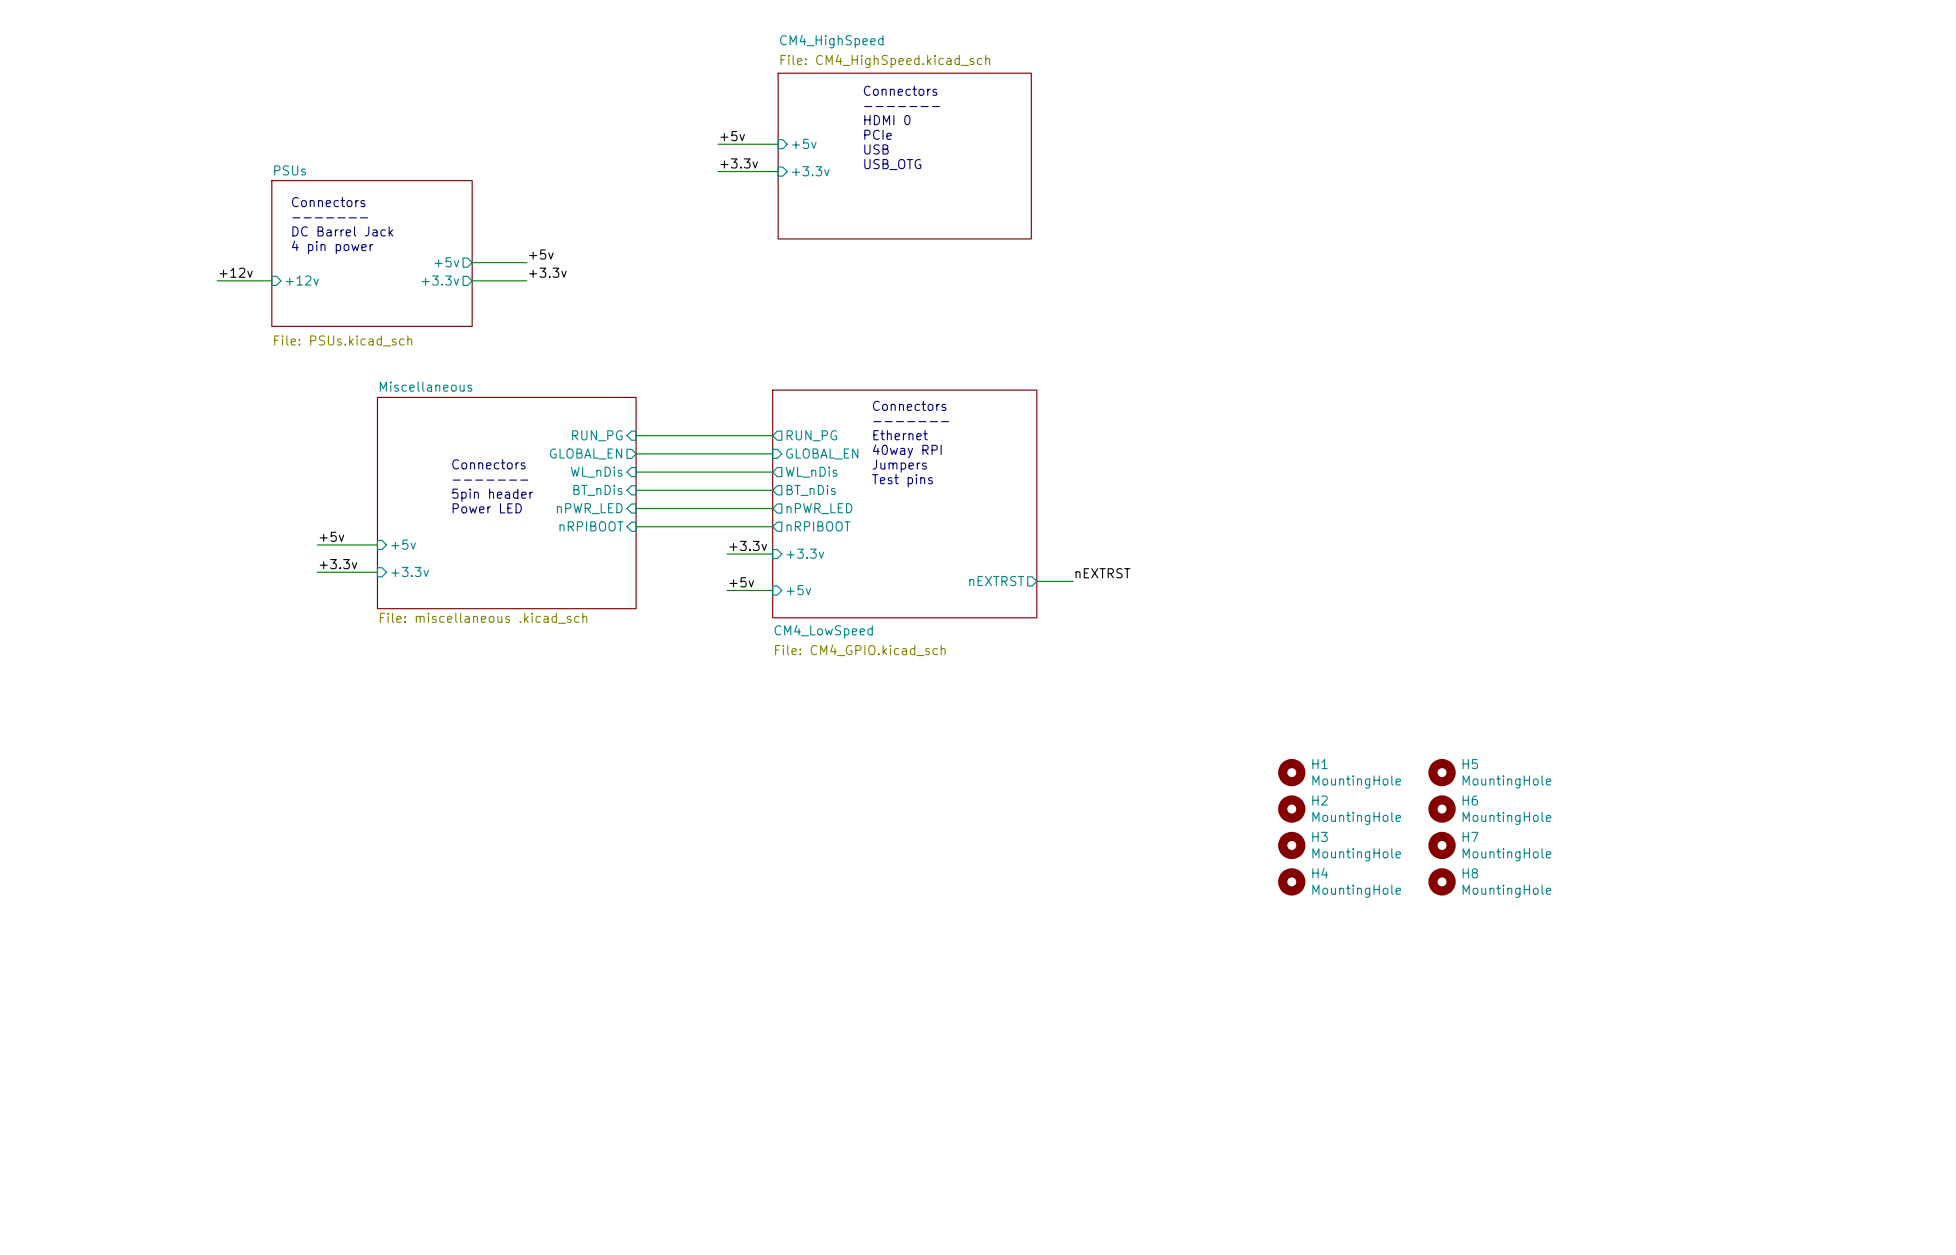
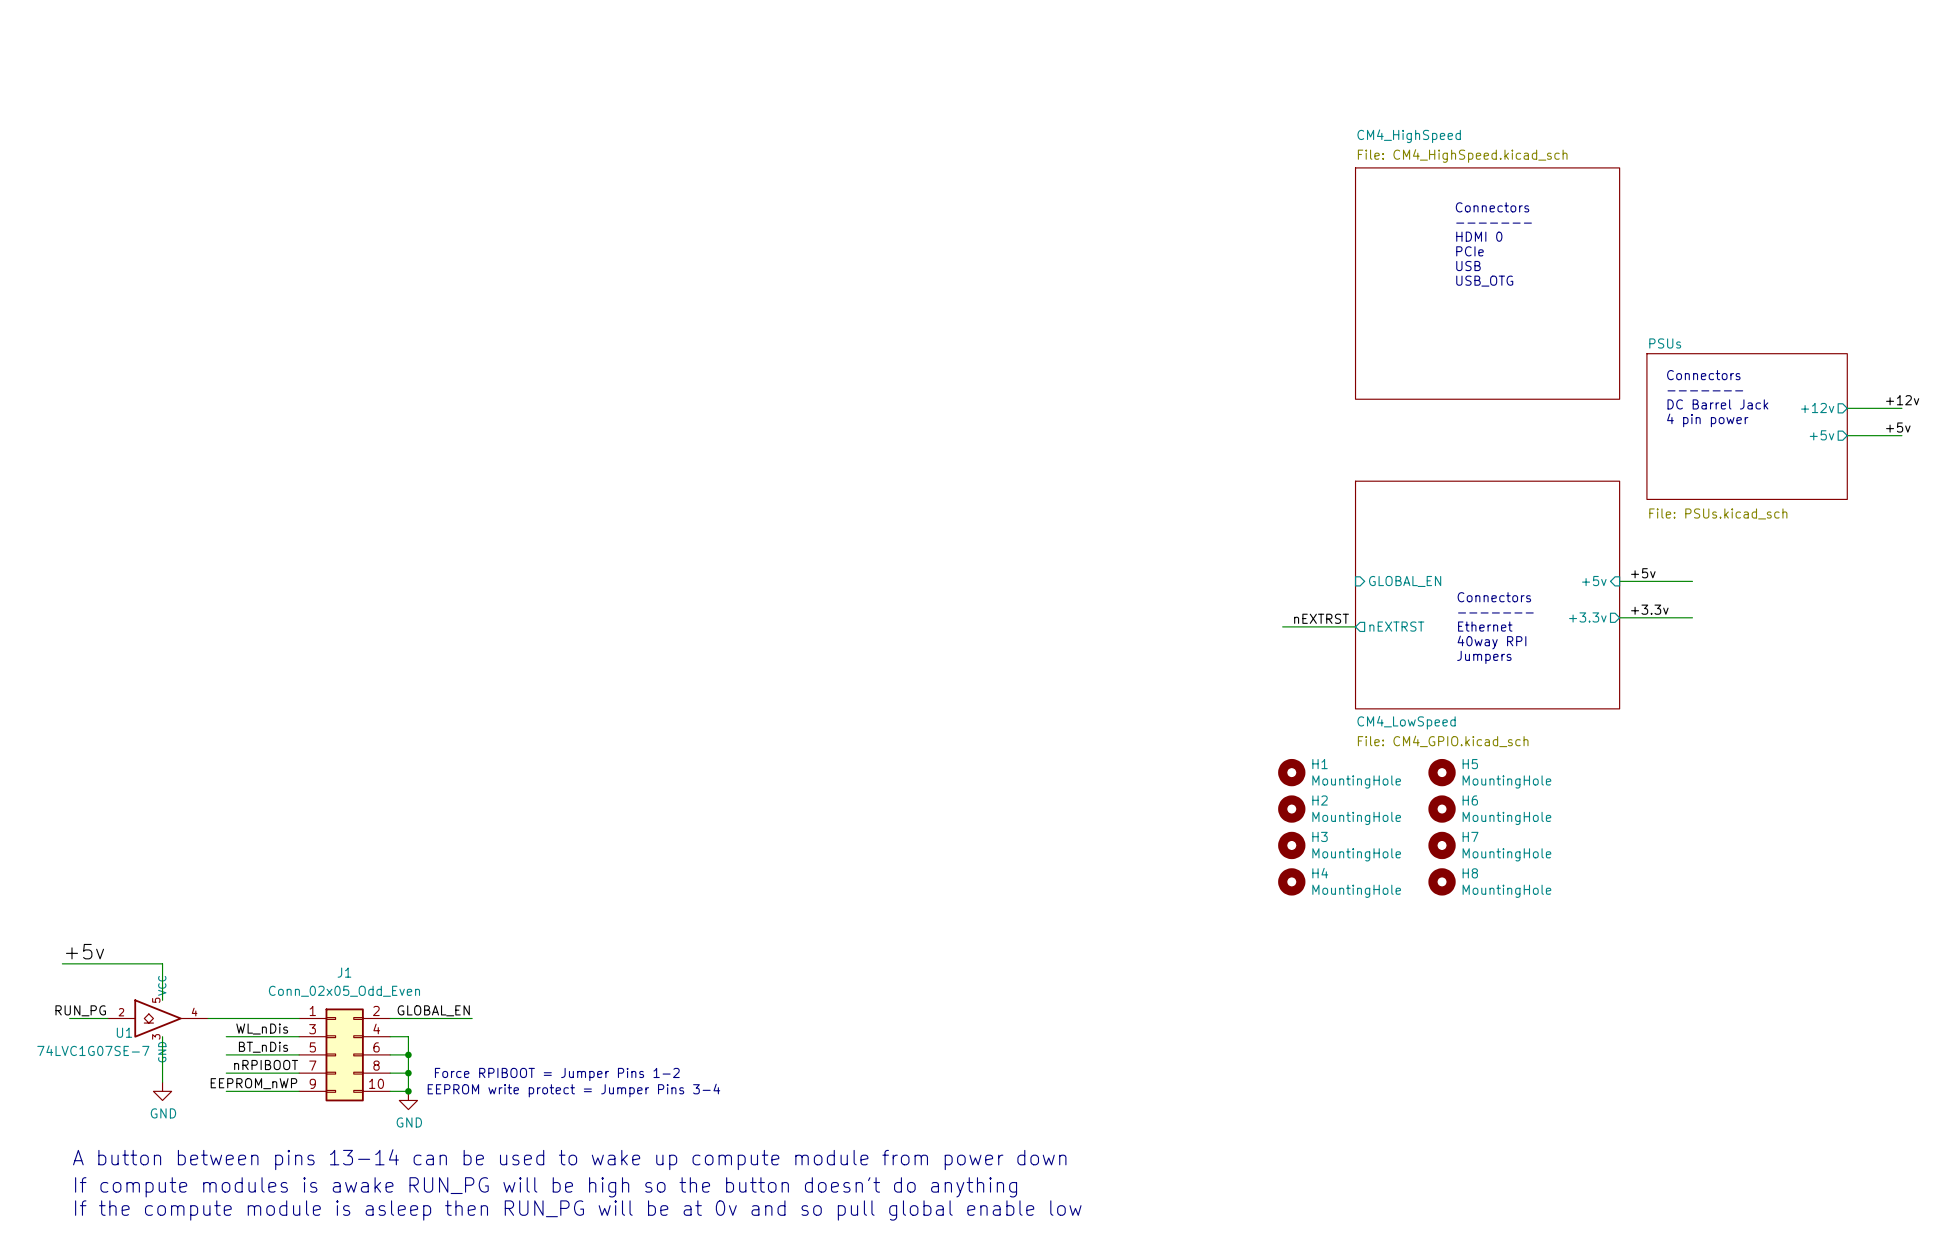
sheet CM4_HighSpeed name position: CM4_HighSpeed (831, 41) -> CM4_HighSpeed (1409, 136)
sheet CM4_HighSpeed value position: File: CM4_HighSpeed.kicad_sch (885, 61) -> File: CM4_HighSpeed.kicad_sch (1462, 156)
sheet CM4_HighSpeed shape: [777, 72, 1032, 240] -> [1354, 167, 1621, 400]
text: Connectors (900, 90) -> none
text: ------- (902, 106) -> none
text: HDMI 0 (887, 120) -> none
text: PCIe (878, 134) -> none
label: +5v (732, 136) -> none
sheet pin: +5v (804, 143) -> none
wire: (718, 144) (778, 144) -> none
text: USB (876, 149) -> none
label: +3.3v (739, 163) -> none
text: USB_OTG (892, 164) -> none
wire: (718, 171) (778, 171) -> none
sheet pin: +3.3v (810, 171) -> none
text: Connectors (328, 202) -> none
text: none -> Connectors (1492, 207)
text: ------- (330, 217) -> none
text: none -> ------- (1494, 223)
text: DC Barrel Jack (342, 231) -> none
text: none -> HDMI 0 (1479, 236)
text: 4 pin power (332, 247) -> none
text: none -> PCIe (1469, 251)
sheet PSUs: File: PSUs.kicad_sch (371, 253) -> none
label: +5v (541, 254) -> none
sheet pin: +5v (446, 262) -> none
wire: (472, 262) (526, 262) -> none
text: none -> USB (1468, 266)
label: +12v (236, 272) -> none
label: +3.3v (547, 272) -> none
wire: (217, 280) (271, 280) -> none
sheet pin: +12v (302, 280) -> none
sheet pin: +3.3v (440, 280) -> none
wire: (472, 280) (526, 280) -> none
text: none -> USB_OTG (1484, 281)
text: none -> Connectors (1703, 375)
text: none -> ------- (1705, 390)
label: none -> +12v (1902, 400)
text: none -> DC Barrel Jack (1717, 404)
text: Connectors (909, 405) -> none
sheet pin: none -> +12v (1817, 408)
wire: none -> (1847, 408) (1901, 408)
text: none -> 4 pin power (1707, 420)
text: ------- (911, 421) -> none
sheet PSUs: none -> File: PSUs.kicad_sch (1747, 426)
label: none -> +5v (1898, 427)
sheet pin: RUN_PG (597, 435) -> none
wire: (636, 435) (772, 435) -> none
sheet pin: RUN_PG (811, 435) -> none
text: Ethernet (900, 435) -> none
sheet pin: none -> +5v (1821, 435)
wire: none -> (1847, 435) (1901, 435)
text: 40way RPI (907, 451) -> none
sheet pin: GLOBAL_EN (586, 453) -> none
wire: (636, 453) (772, 453) -> none
sheet pin: GLOBAL_EN (822, 453) -> none
text: Connectors (488, 464) -> none
text: Jumpers (899, 466) -> none
sheet pin: WL_nDis (596, 472) -> none
wire: (636, 472) (772, 472) -> none
sheet pin: WL_nDis (811, 472) -> none
text: ------- (490, 480) -> none
text: Test pins (902, 480) -> none
sheet pin: BT_nDis (598, 490) -> none
wire: (636, 490) (772, 490) -> none
sheet pin: BT_nDis (811, 490) -> none
text: 5pin header (492, 495) -> none
sheet Miscellaneous: File: miscellaneous .kicad_sch (506, 503) -> none
sheet CM4_LowSpeed position: (904, 503) -> (1487, 595)
text: Power LED (487, 508) -> none
sheet pin: nPWR_LED (589, 508) -> none
wire: (636, 508) (772, 508) -> none
sheet pin: nPWR_LED (819, 508) -> none
sheet pin: nRPIBOOT (591, 526) -> none
wire: (636, 526) (772, 526) -> none
sheet pin: nRPIBOOT (818, 526) -> none
label: +5v (331, 536) -> none
wire: (317, 544) (377, 544) -> none
sheet pin: +5v (403, 544) -> none
label: +3.3v (748, 545) -> none
sheet pin: +3.3v (805, 553) -> none
wire: (727, 554) (772, 554) -> none
label: +3.3v (338, 564) -> none
sheet pin: +3.3v (410, 571) -> none
wire: (317, 572) (377, 572) -> none
label: nEXTRST (1102, 573) -> none
label: none -> +5v (1643, 573)
sheet pin: nEXTRST (996, 581) -> none
wire: (1036, 581) (1073, 581) -> none
sheet pin: none -> GLOBAL_EN (1405, 581)
sheet pin: none -> +5v (1594, 581)
wire: none -> (1619, 581) (1692, 581)
label: +5v (741, 582) -> none
wire: (727, 590) (772, 590) -> none
sheet pin: +5v (798, 590) -> none
text: none -> Connectors (1494, 597)
label: none -> +3.3v (1649, 609)
text: none -> ------- (1495, 612)
sheet pin: none -> +3.3v (1587, 617)
wire: none -> (1619, 617) (1692, 617)
label: none -> nEXTRST (1321, 618)
wire: none -> (1282, 626) (1355, 626)
sheet pin: none -> nEXTRST (1396, 626)
text: none -> Ethernet (1485, 626)
text: none -> 40way RPI (1491, 642)
text: none -> Jumpers (1484, 657)
label: none -> +5v (85, 951)
wire: none -> (62, 963) (162, 963) (162, 1000)
label: none -> RUN_PG (80, 1010)
label: none -> GLOBAL_EN (433, 1010)
wire: none -> (69, 1018) (107, 1018)
U1: none -> 74LVC1G07SE-7 (157, 1018)
wire: none -> (208, 1018) (299, 1018)
wire: none -> (390, 1018) (472, 1018)
label: none -> WL_nDis (262, 1029)
wire: none -> (162, 1036) (162, 1082)
wire: none -> (226, 1036) (299, 1036)
wire: none -> (390, 1036) (408, 1036) (408, 1091) (390, 1091)
label: none -> BT_nDis (263, 1047)
wire: none -> (226, 1054) (299, 1054)
J1: none -> Conn_02x05_Odd_Even (344, 1054)
wire: none -> (390, 1054) (408, 1054)
junction: none -> (408, 1054)
label: none -> nRPIBOOT (266, 1065)
wire: none -> (226, 1073) (299, 1073)
wire: none -> (390, 1073) (408, 1073)
junction: none -> (408, 1073)
text: none -> Force RPIBOOT = Jumper Pins 1-2 (557, 1074)
label: none -> EEPROM_nWP (253, 1083)
text: none -> EEPROM write protect = Jumper Pins 3-4 (573, 1090)
power symbol: none -> GND (162, 1091)
wire: none -> (226, 1091) (299, 1091)
junction: none -> (408, 1091)
power symbol: none -> GND (408, 1100)
text: none -> A button between pins 13-14 can be used to wake up compute module from power down (569, 1159)
text: none -> If compute modules is awake RUN_PG will be high so the button doesn't do anything (546, 1187)
text: none -> If the compute module is asleep then RUN_PG will be at 0v and so pull global enable low (578, 1210)

